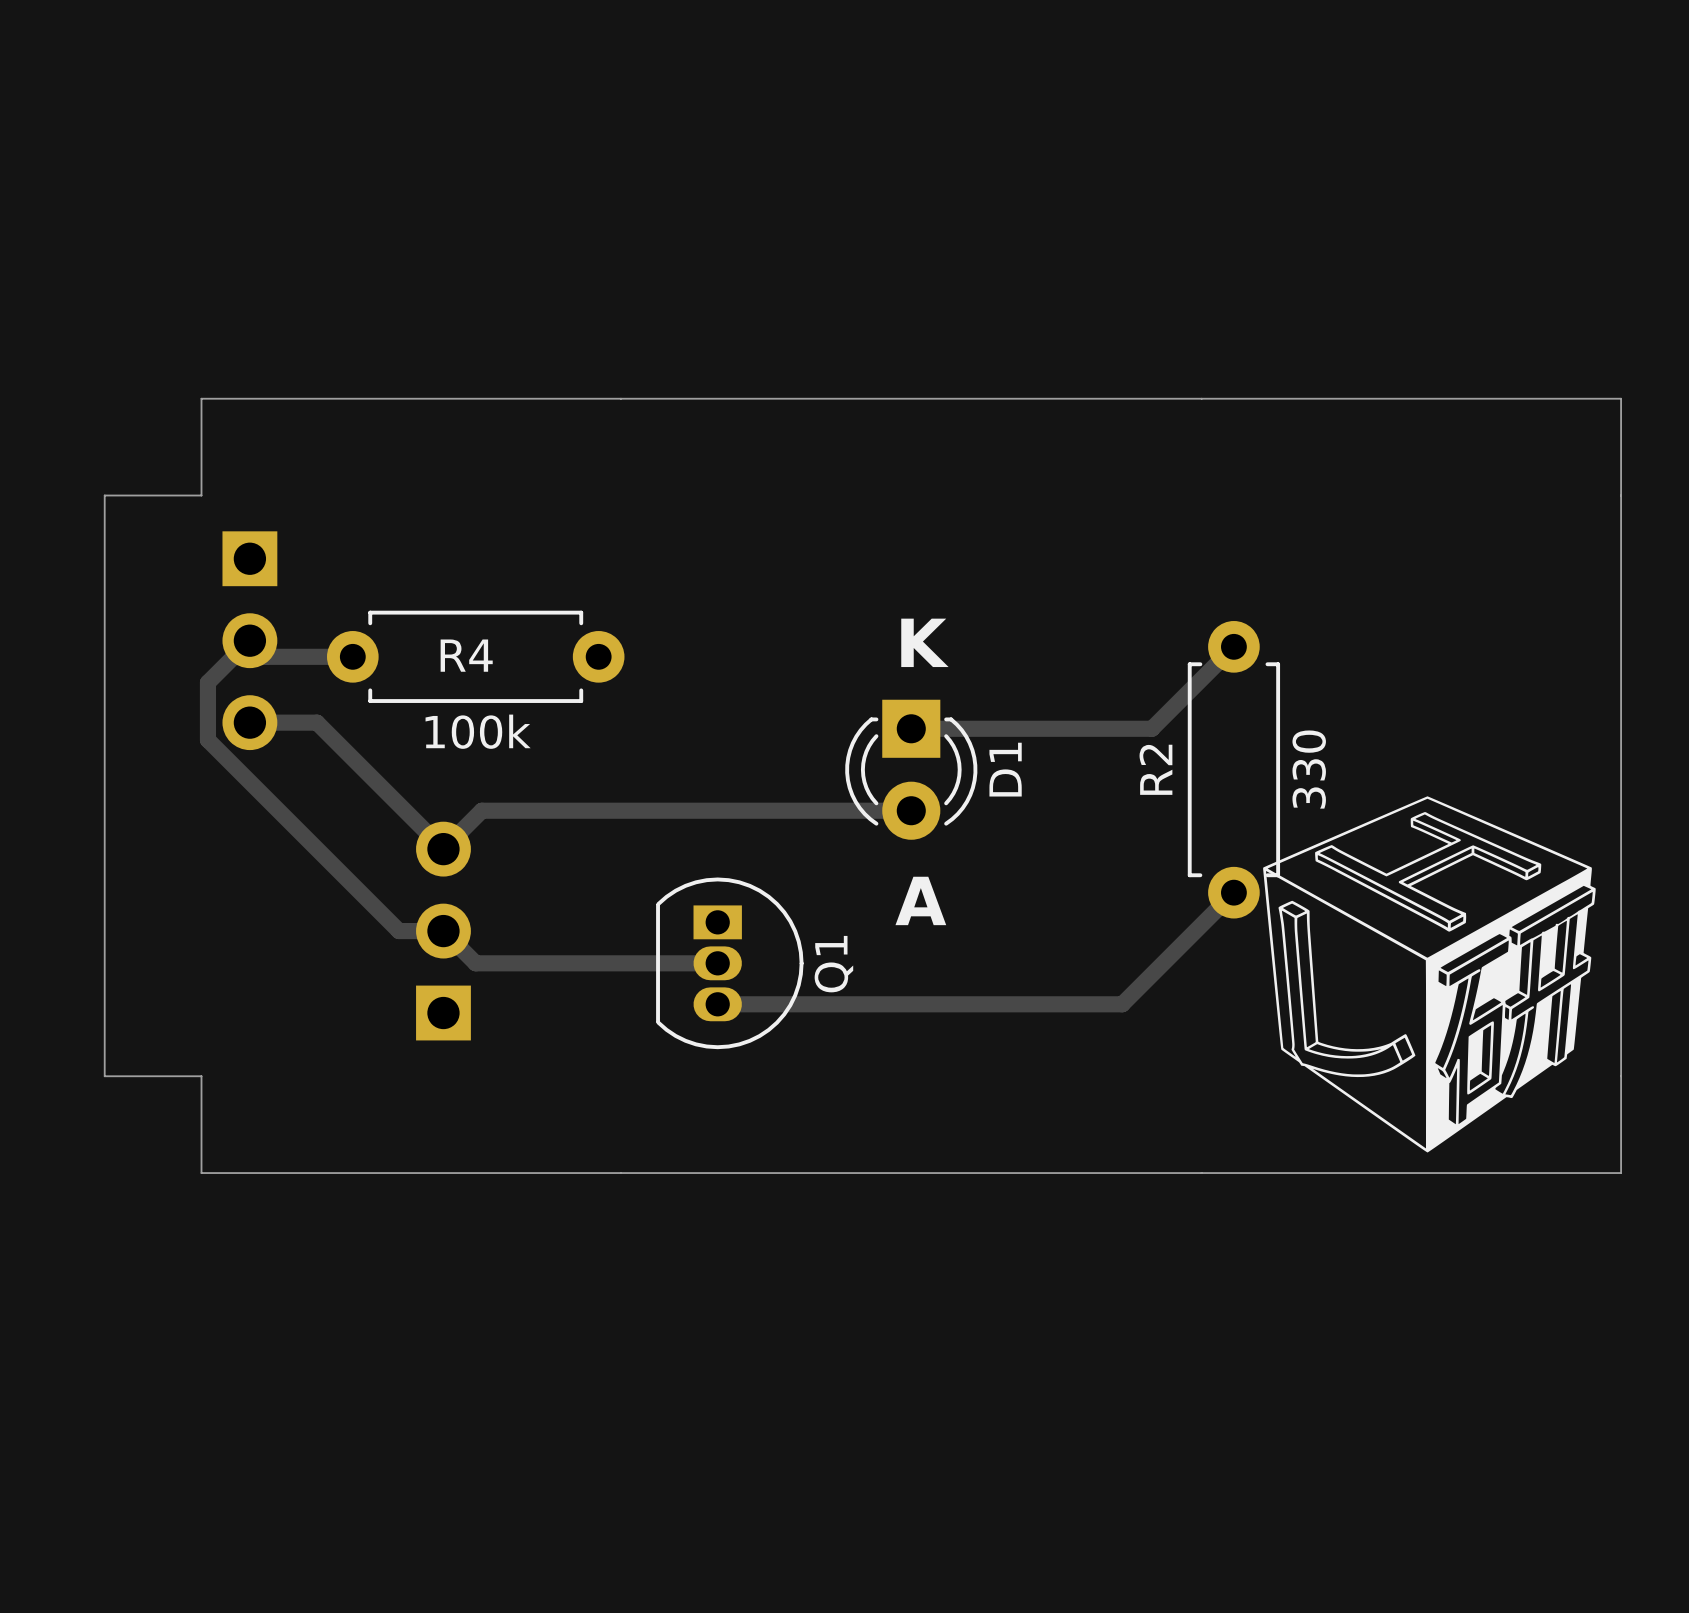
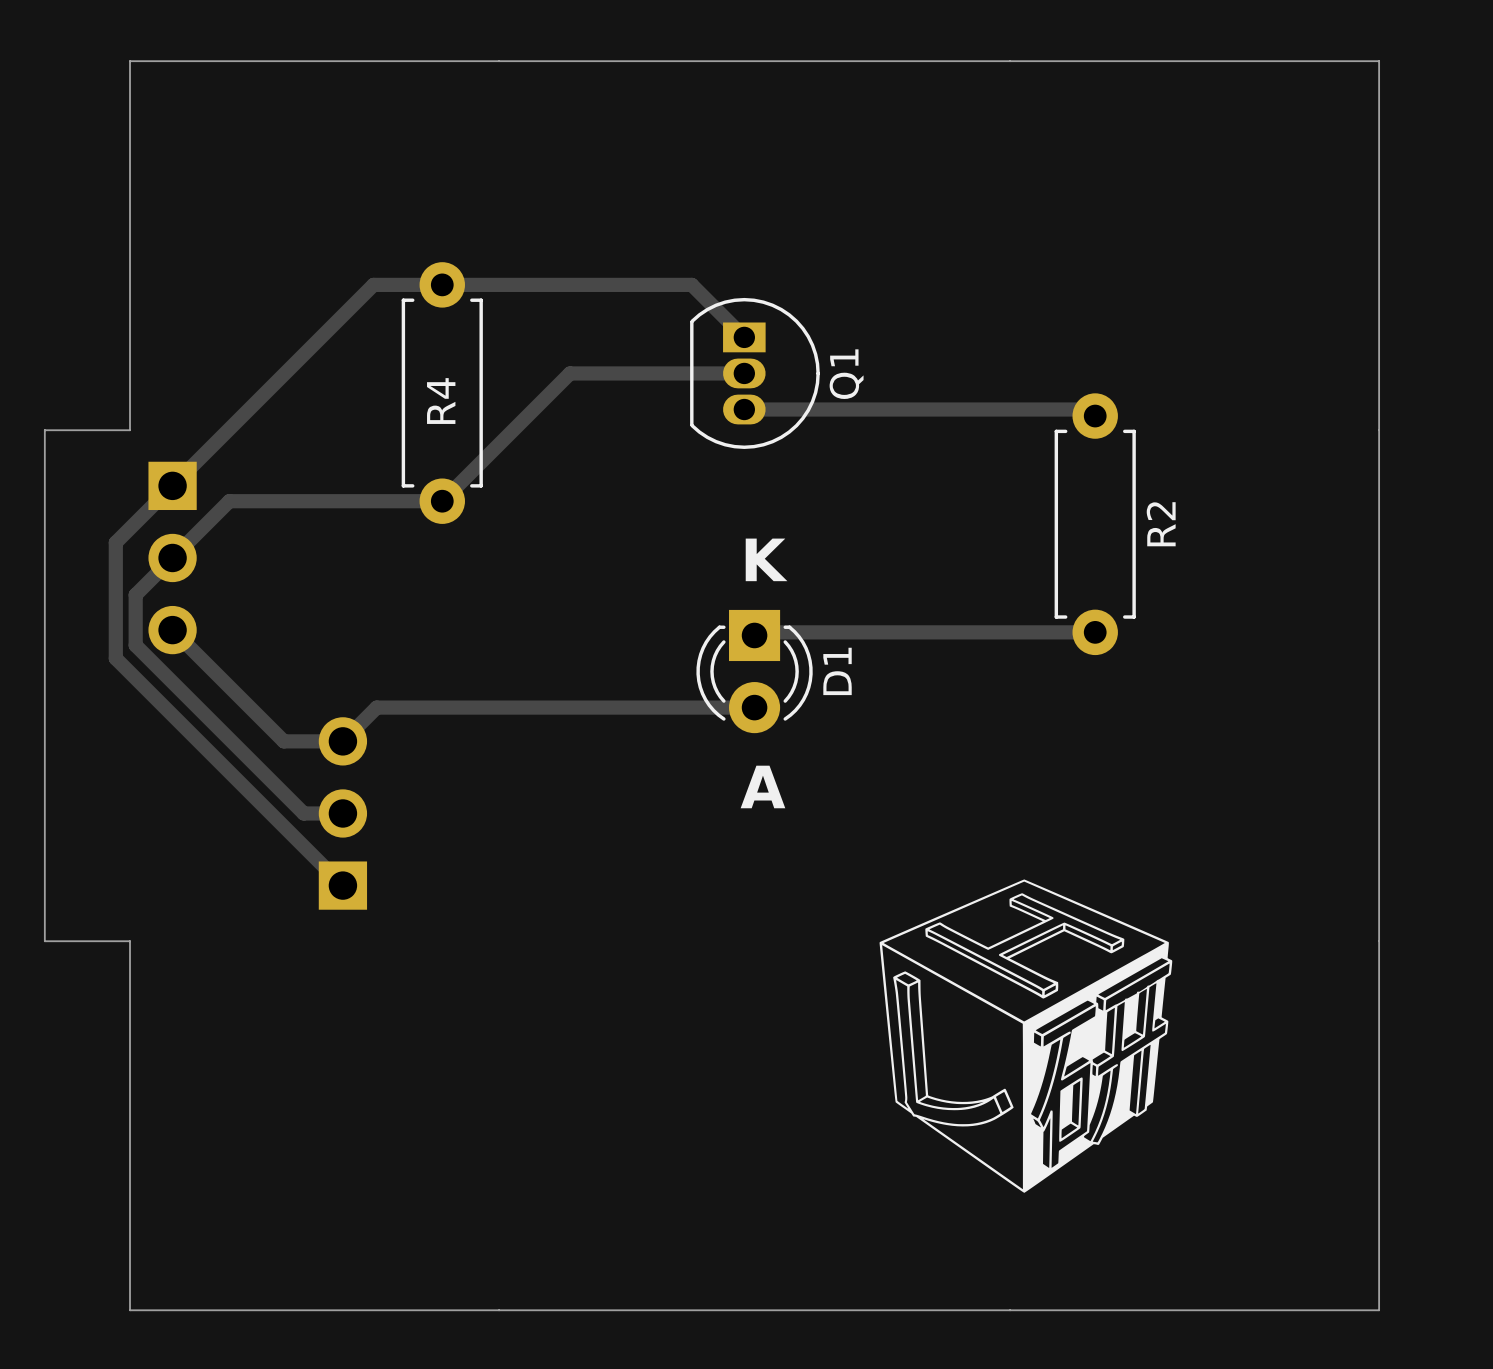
track: none -> (744, 337) (691, 284) (373, 284) (115, 542) (115, 658) (342, 885)
board edge: (201, 398) (1621, 398) -> (130, 345) (130, 61) (1379, 61) (1379, 345)
track: none -> (744, 409) (1088, 409) (1095, 416)
track: (249, 640) (266, 656) (352, 656) -> (172, 557) (229, 501) (442, 501) (570, 373) (744, 373)
track: (1233, 646) (1151, 728) (911, 728) -> (1095, 632) (757, 632) (754, 635)
R4 rotation: 0° (475, 656) -> 90° clockwise (442, 393)
R4 position: (475, 656) -> (442, 393)
track: (249, 722) (317, 722) (443, 849) -> (172, 630) (283, 741) (342, 741)
R4 value: 100k (478, 731) -> none
R2 name position: R2 (1155, 769) -> R2 (1161, 524)
R2 position: (1233, 769) -> (1095, 524)
R2 value: 330 (1309, 769) -> none
track: (1233, 892) (1122, 1004) (717, 1004) -> none
track: (443, 931) (475, 963) (717, 963) -> none
Q1 position: (729, 963) -> (754, 373)
drawing position: (1429, 974) -> (1025, 1036)
board edge: (201, 1173) (1621, 1173) -> (130, 1026) (130, 1310) (1379, 1310) (1379, 1026)

